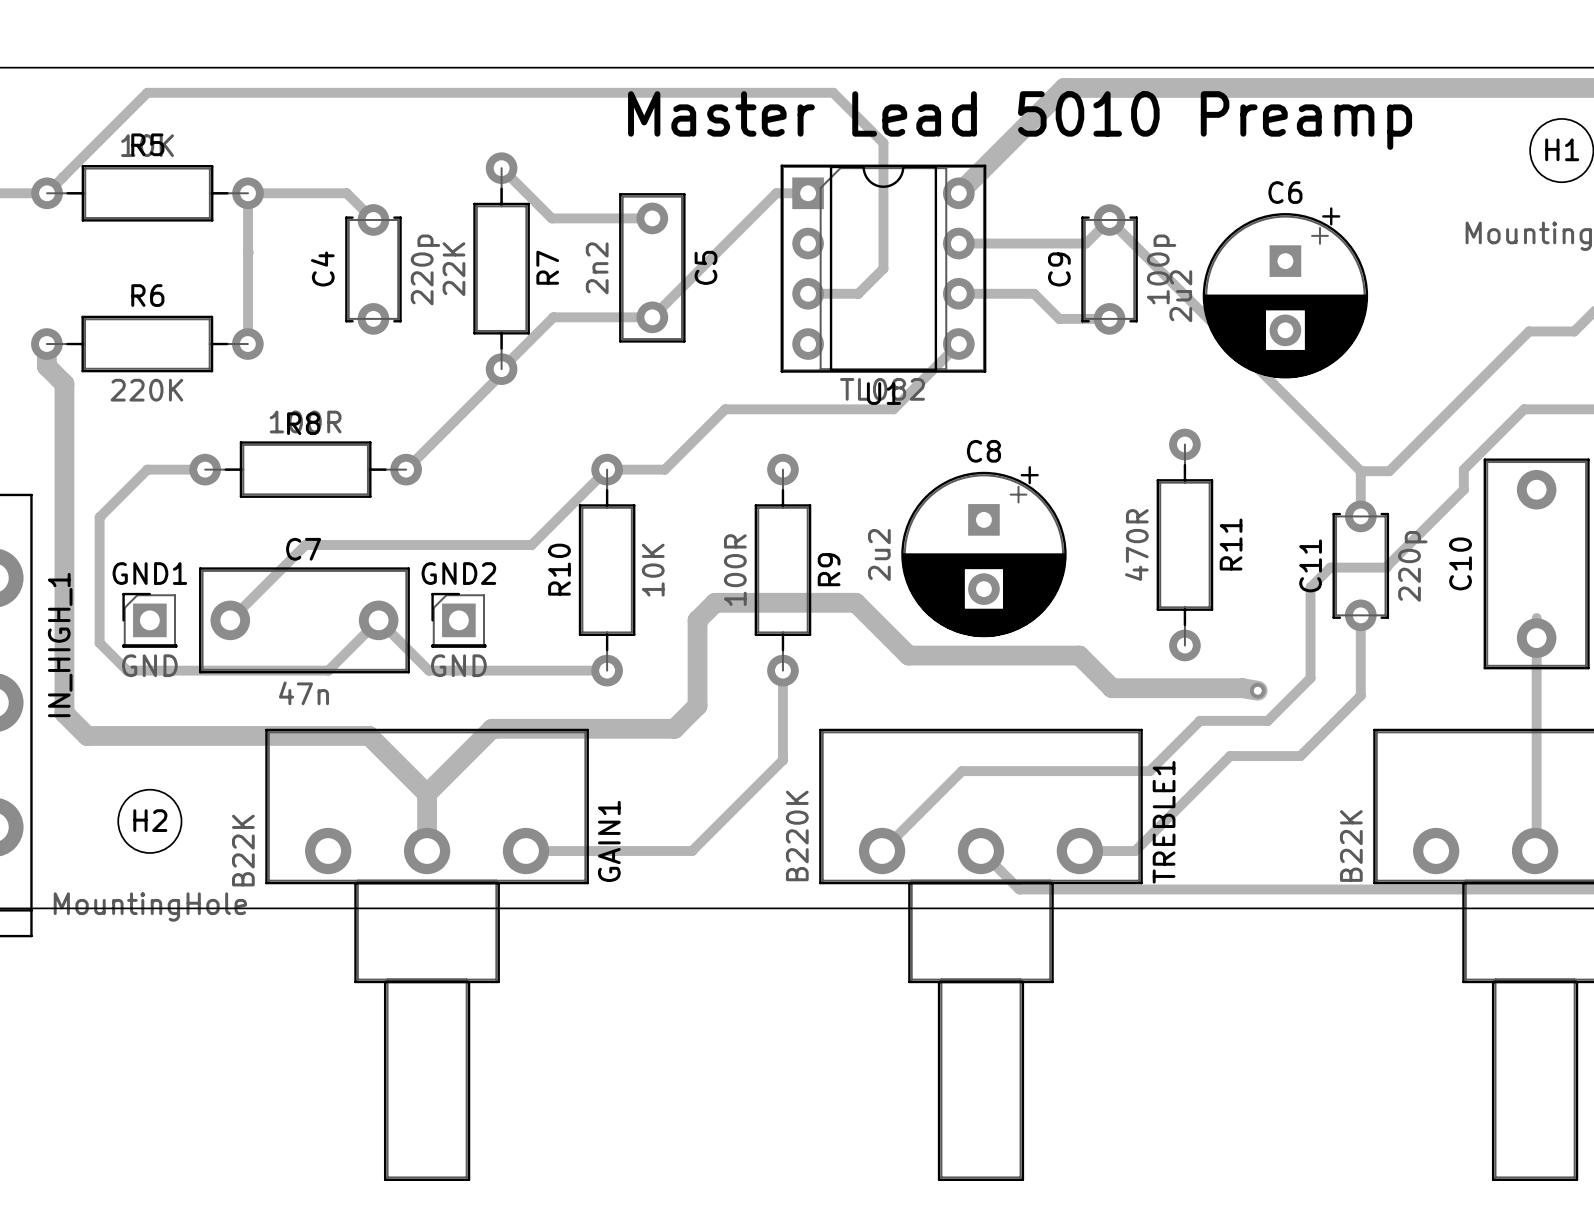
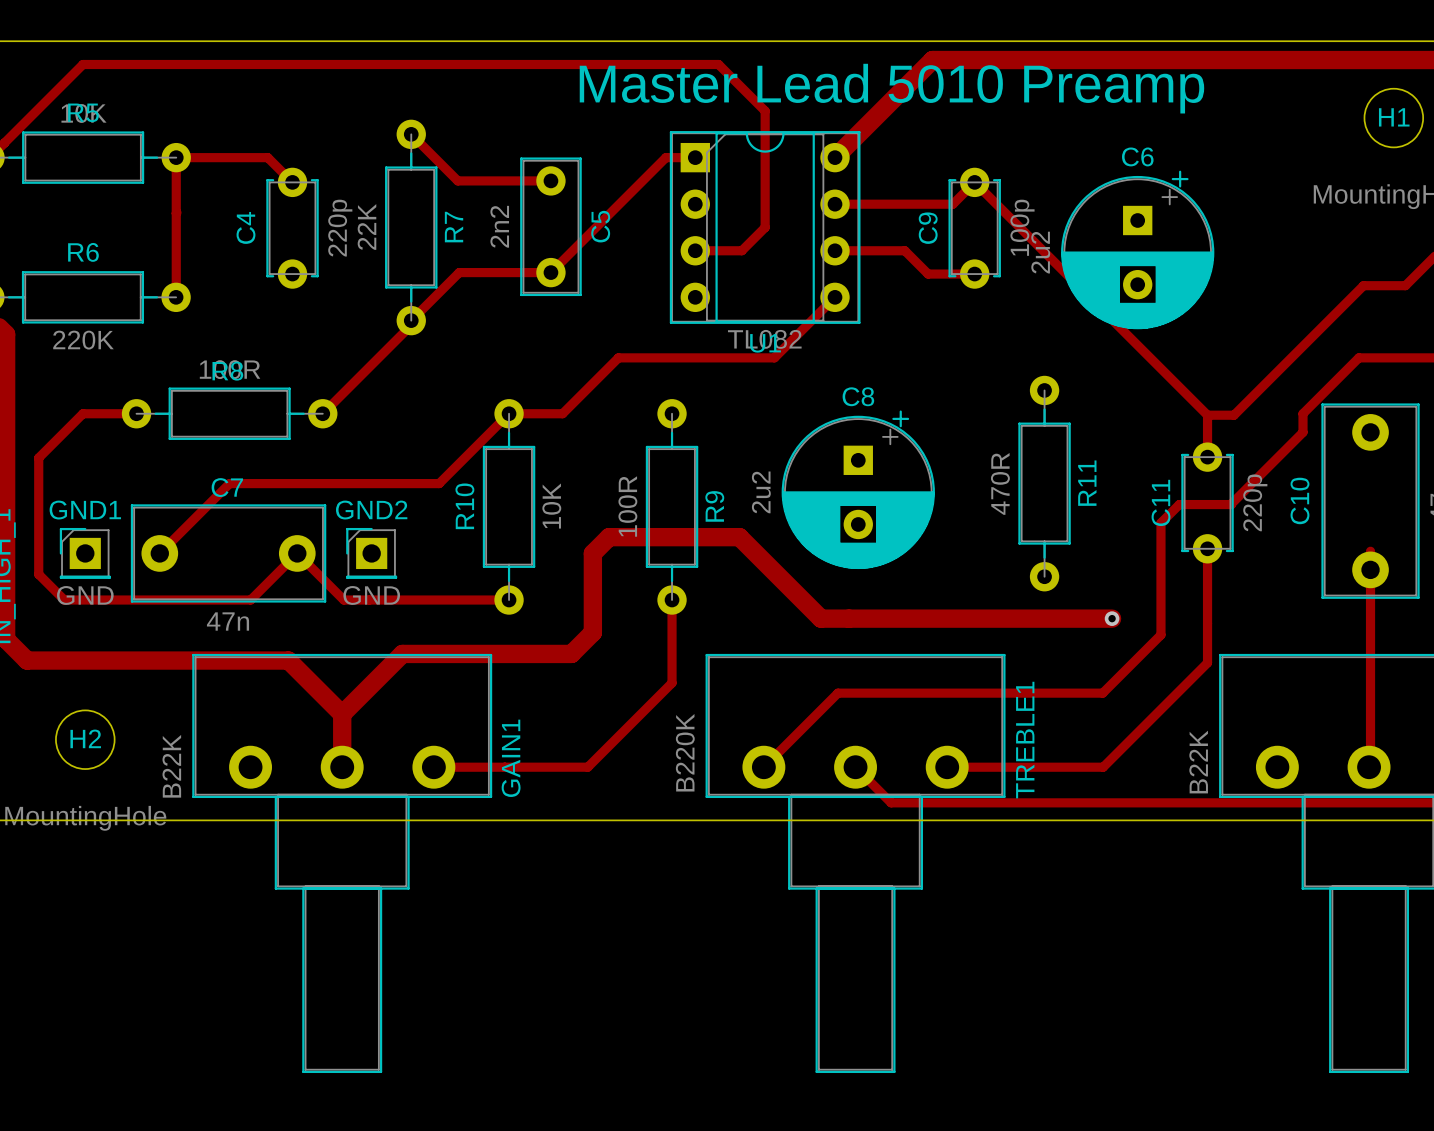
track: (908, 655) (1079, 655) (1112, 688) (1242, 688) (1257, 690) -> (788, 586) (821, 618) (1112, 618)
track: (1310, 678) (1267, 720) (1200, 720) (1149, 771) -> (1160, 607) (1160, 634) (1102, 693) (1011, 693)
track: (1360, 695) (1300, 756) (1230, 756) (1135, 851) -> (1207, 623) (1207, 662) (1103, 767) (998, 767)

